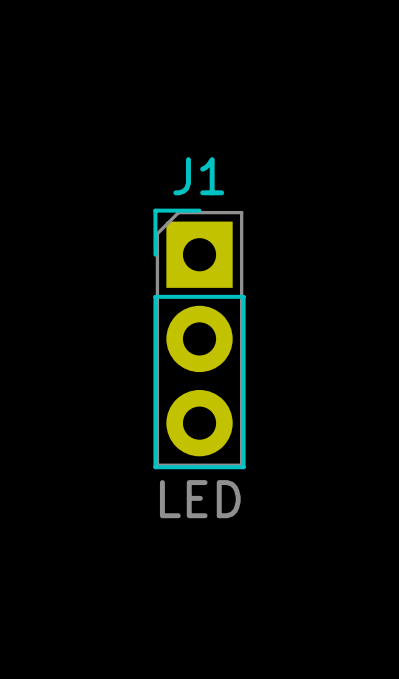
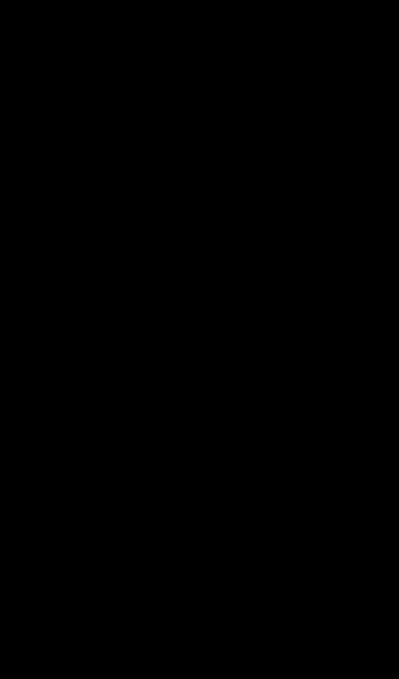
J1: LED (199, 338) -> none

